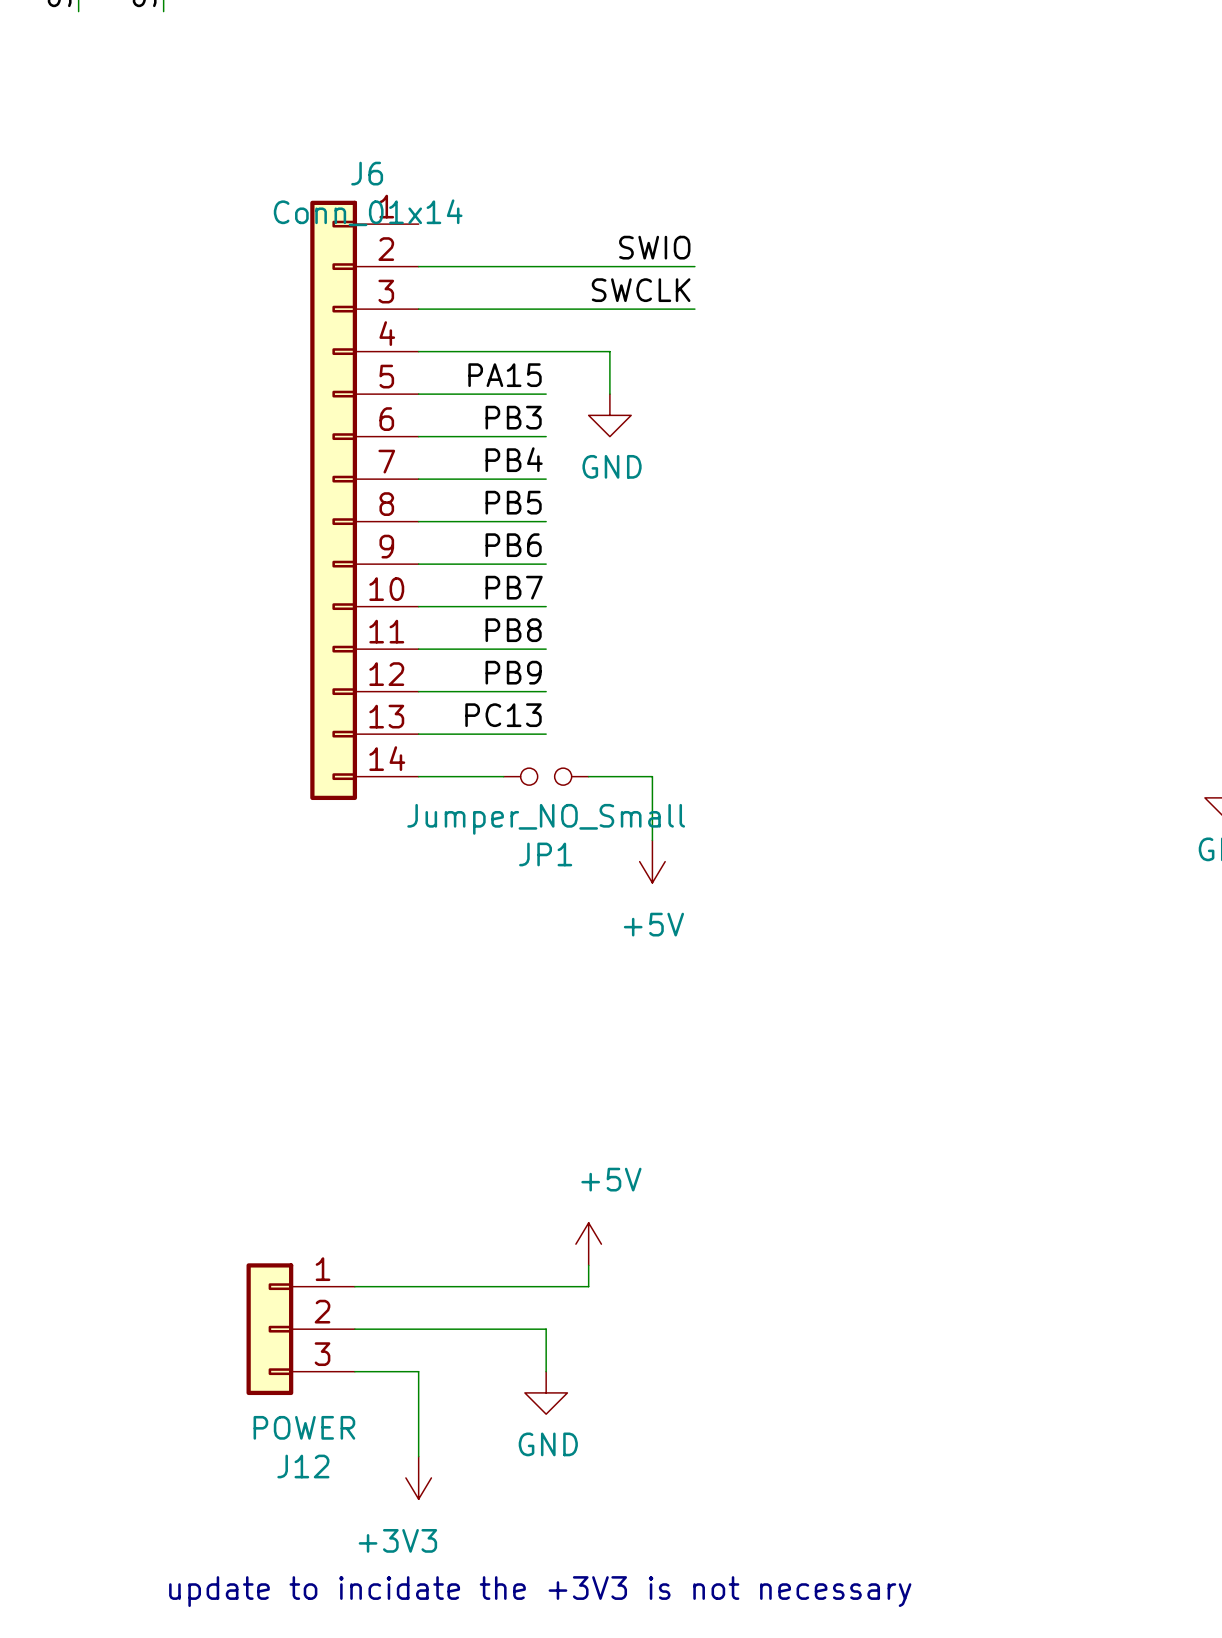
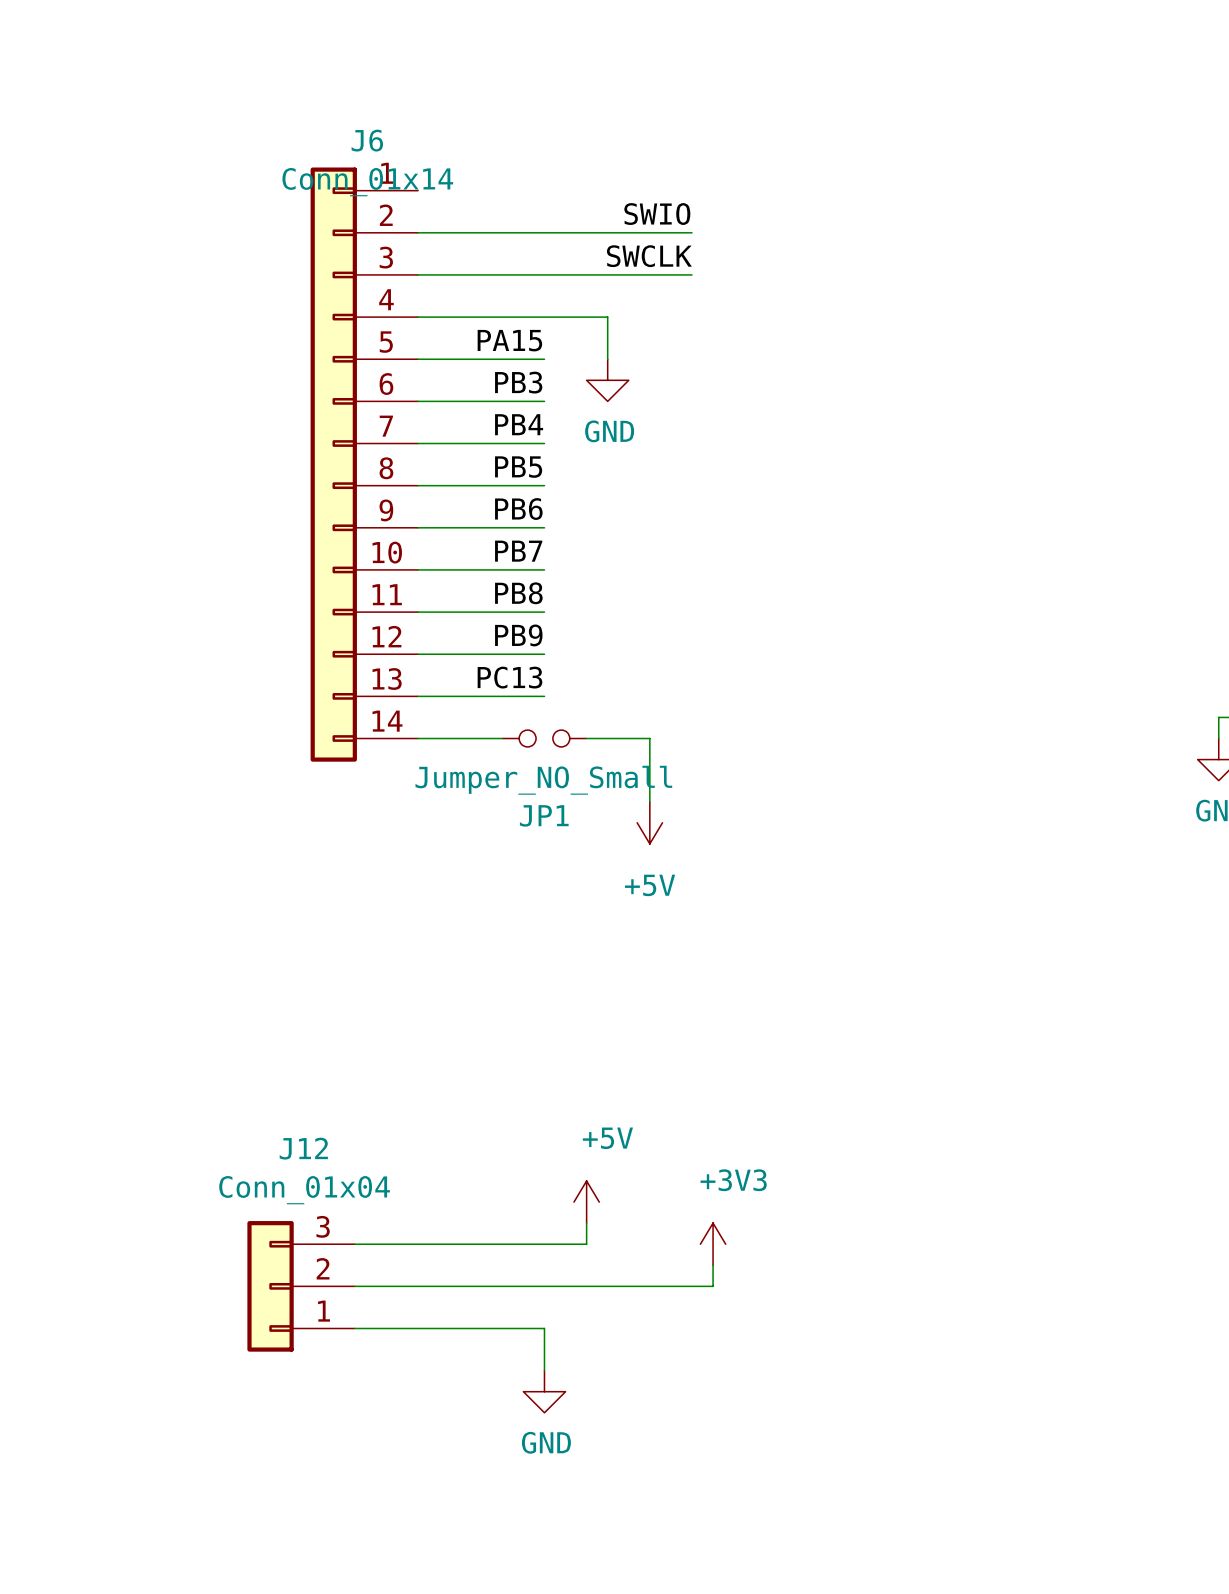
J12 flip: as is (269, 1329) -> up-down (270, 1286)
wire: (546, 1329) (546, 1371) -> (544, 1286) (713, 1286) (713, 1265)
wire: (418, 1371) (418, 1456) -> (418, 1328) (544, 1328) (544, 1370)
power symbol position: GND (546, 1392) -> GND (544, 1391)
J12 value: POWER (304, 1427) -> Conn_01x04 (304, 1190)
power symbol rotation: 0° (418, 1477) -> 180° (713, 1244)
power symbol position: +3V3 (418, 1477) -> +3V3 (713, 1244)
text: update to incidate the +3V3 is not necessary (540, 1591) -> none

